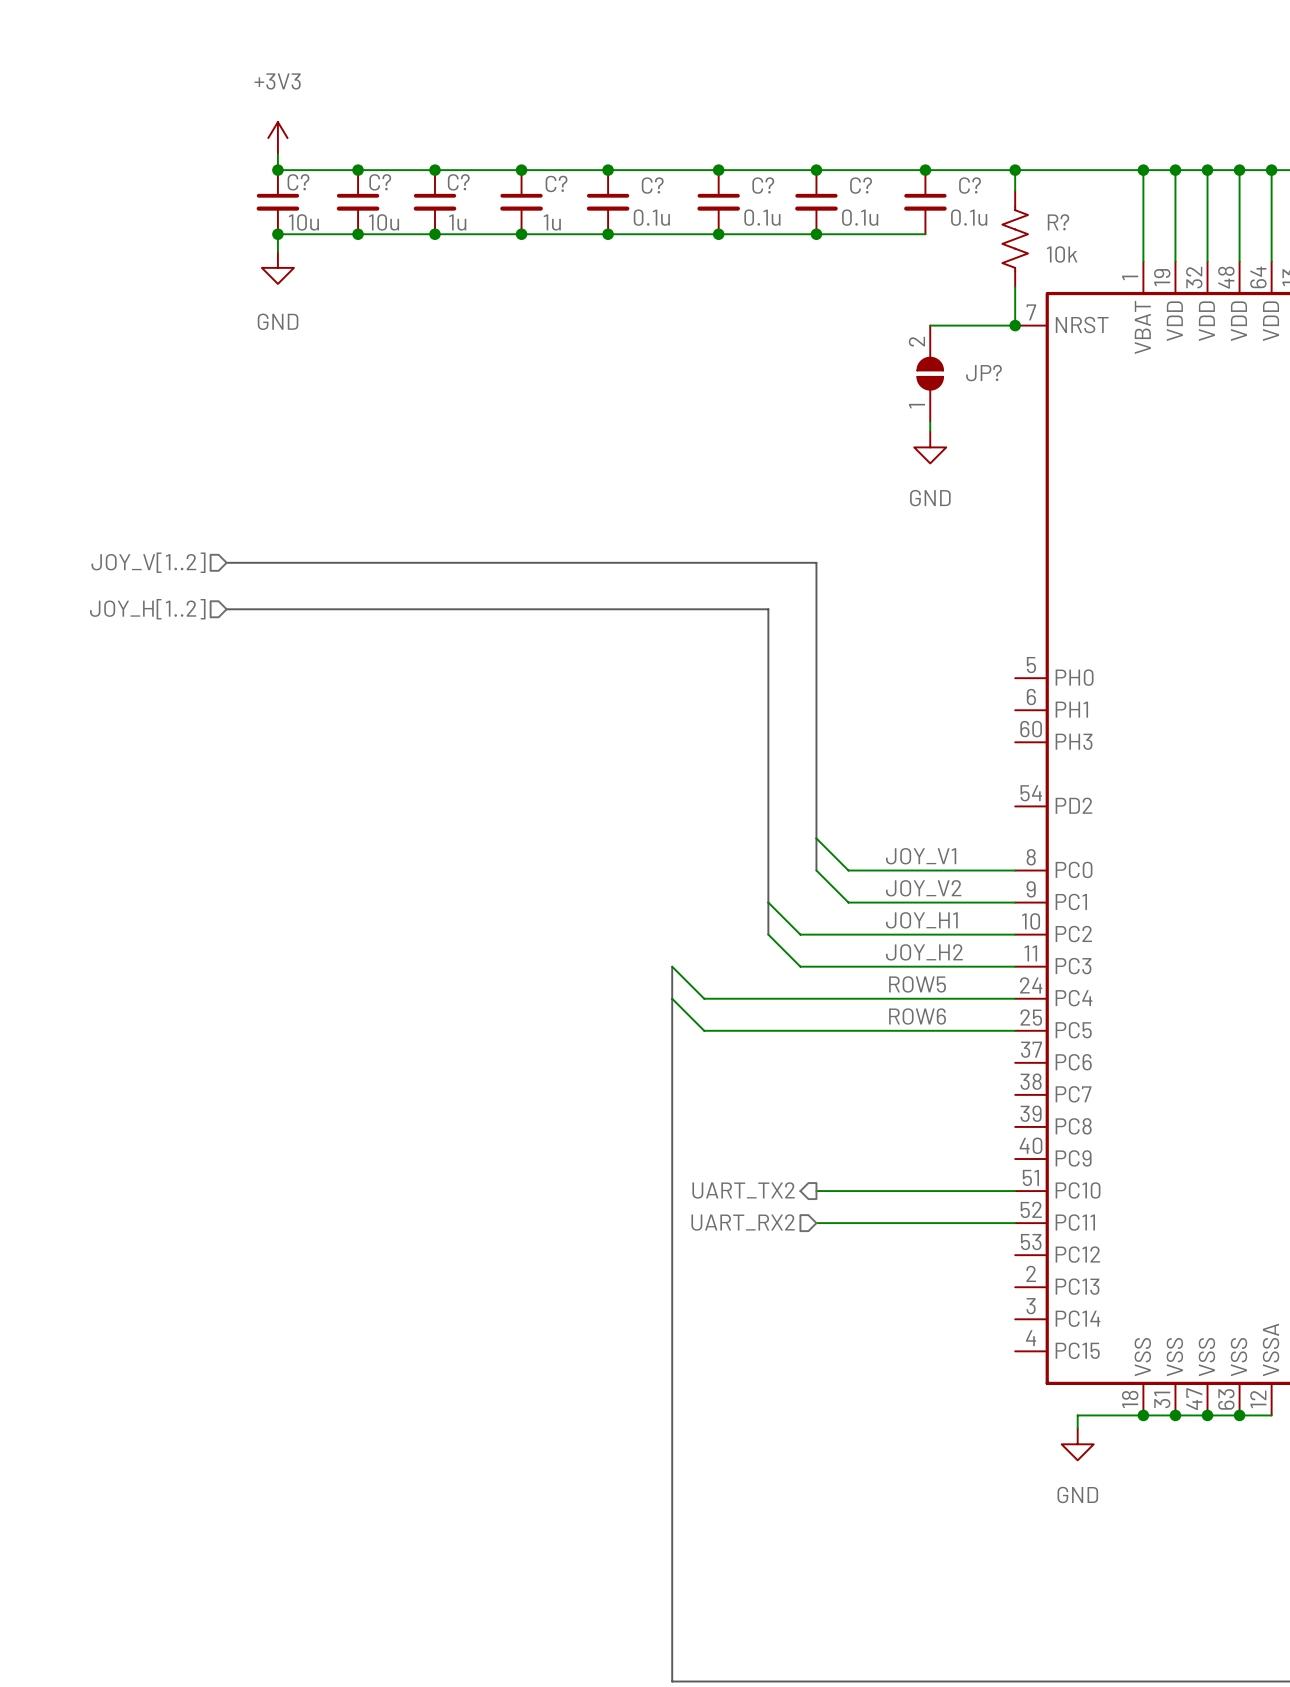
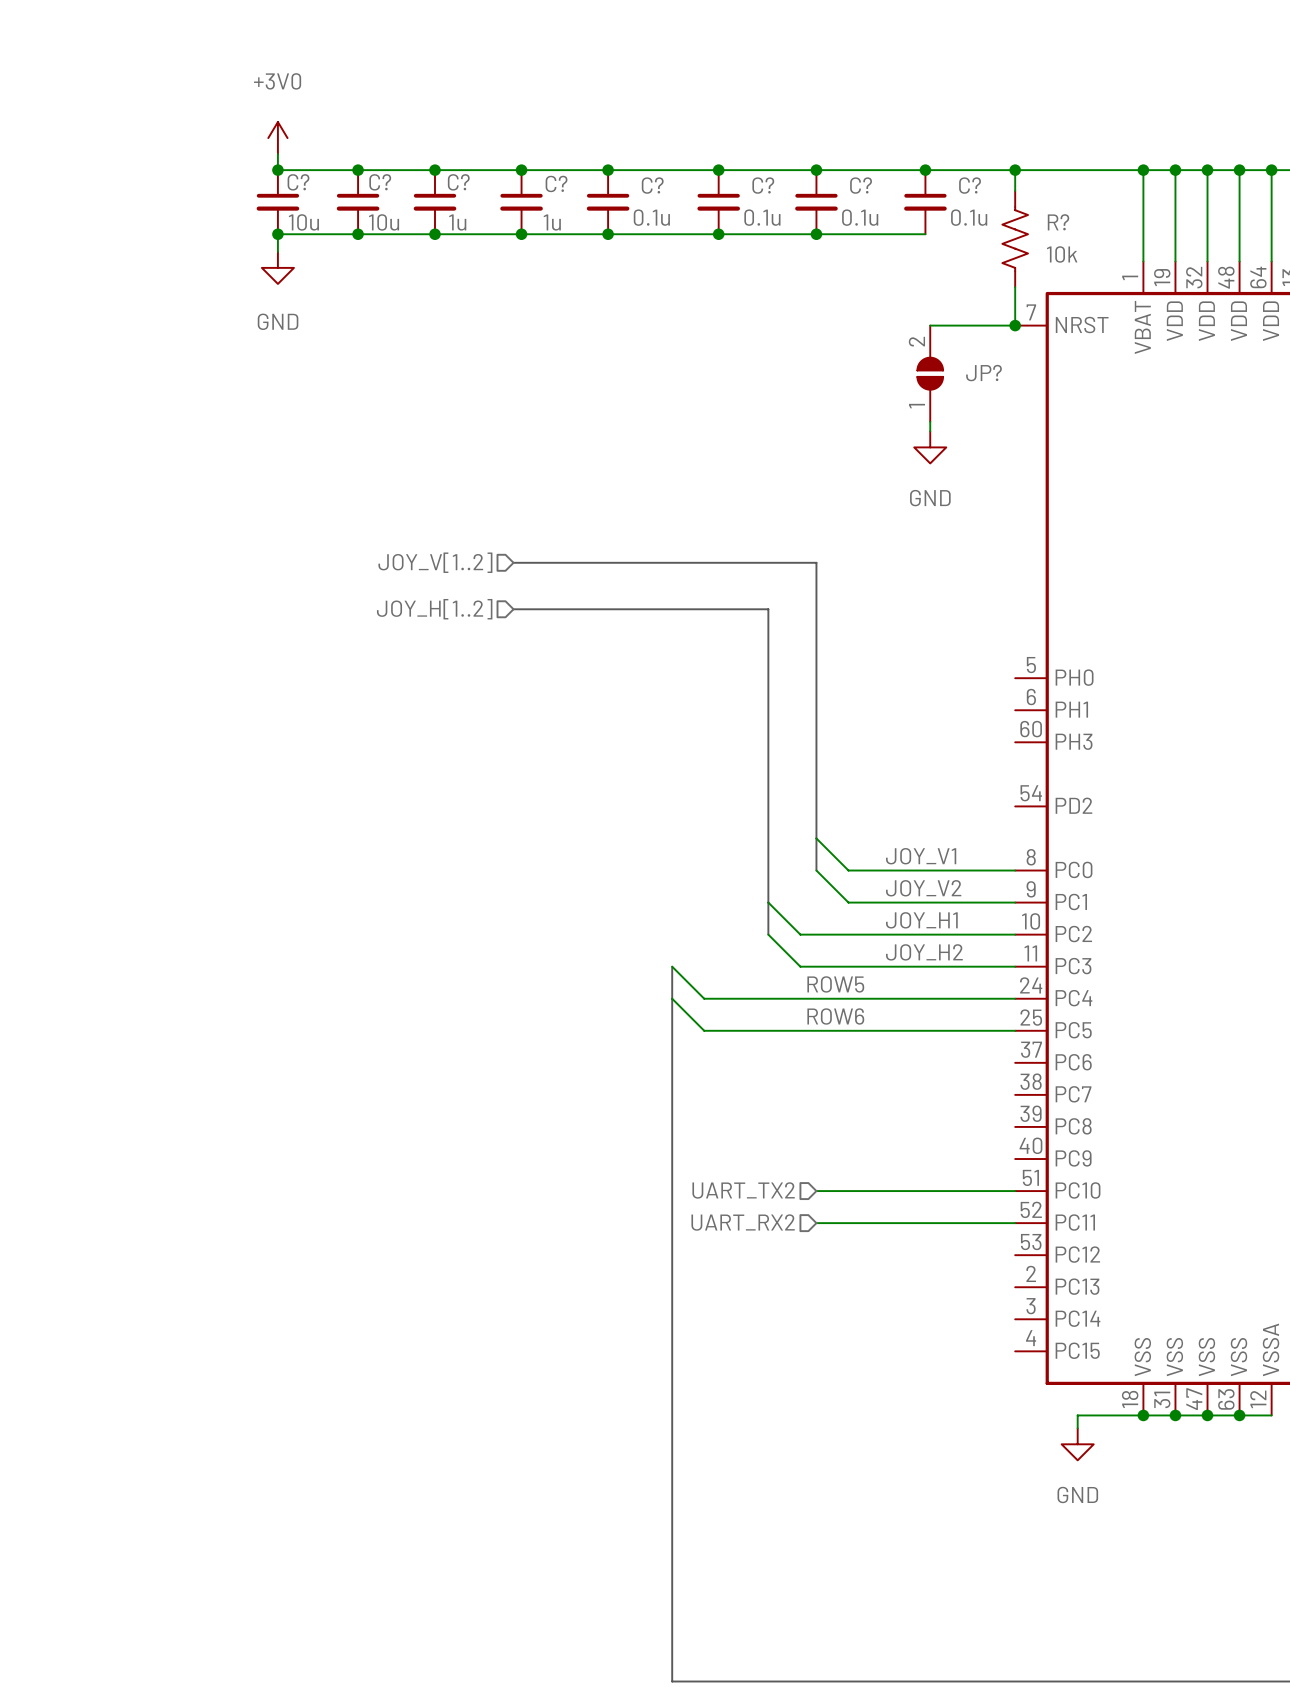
power symbol: +3V3 (277, 138) -> +3V0 (277, 138)
hierarchical label position: JOY_V[1..2] (148, 562) -> JOY_V[1..2] (435, 562)
bus: (226, 562) (513, 562) -> none
hierarchical label position: JOY_H[1..2] (147, 609) -> JOY_H[1..2] (434, 609)
bus: (226, 609) (513, 609) -> none
label position: ROW5 (917, 984) -> ROW5 (835, 984)
label position: ROW6 (917, 1016) -> ROW6 (835, 1016)
hierarchical label shape: output (743, 1190) -> input (743, 1190)

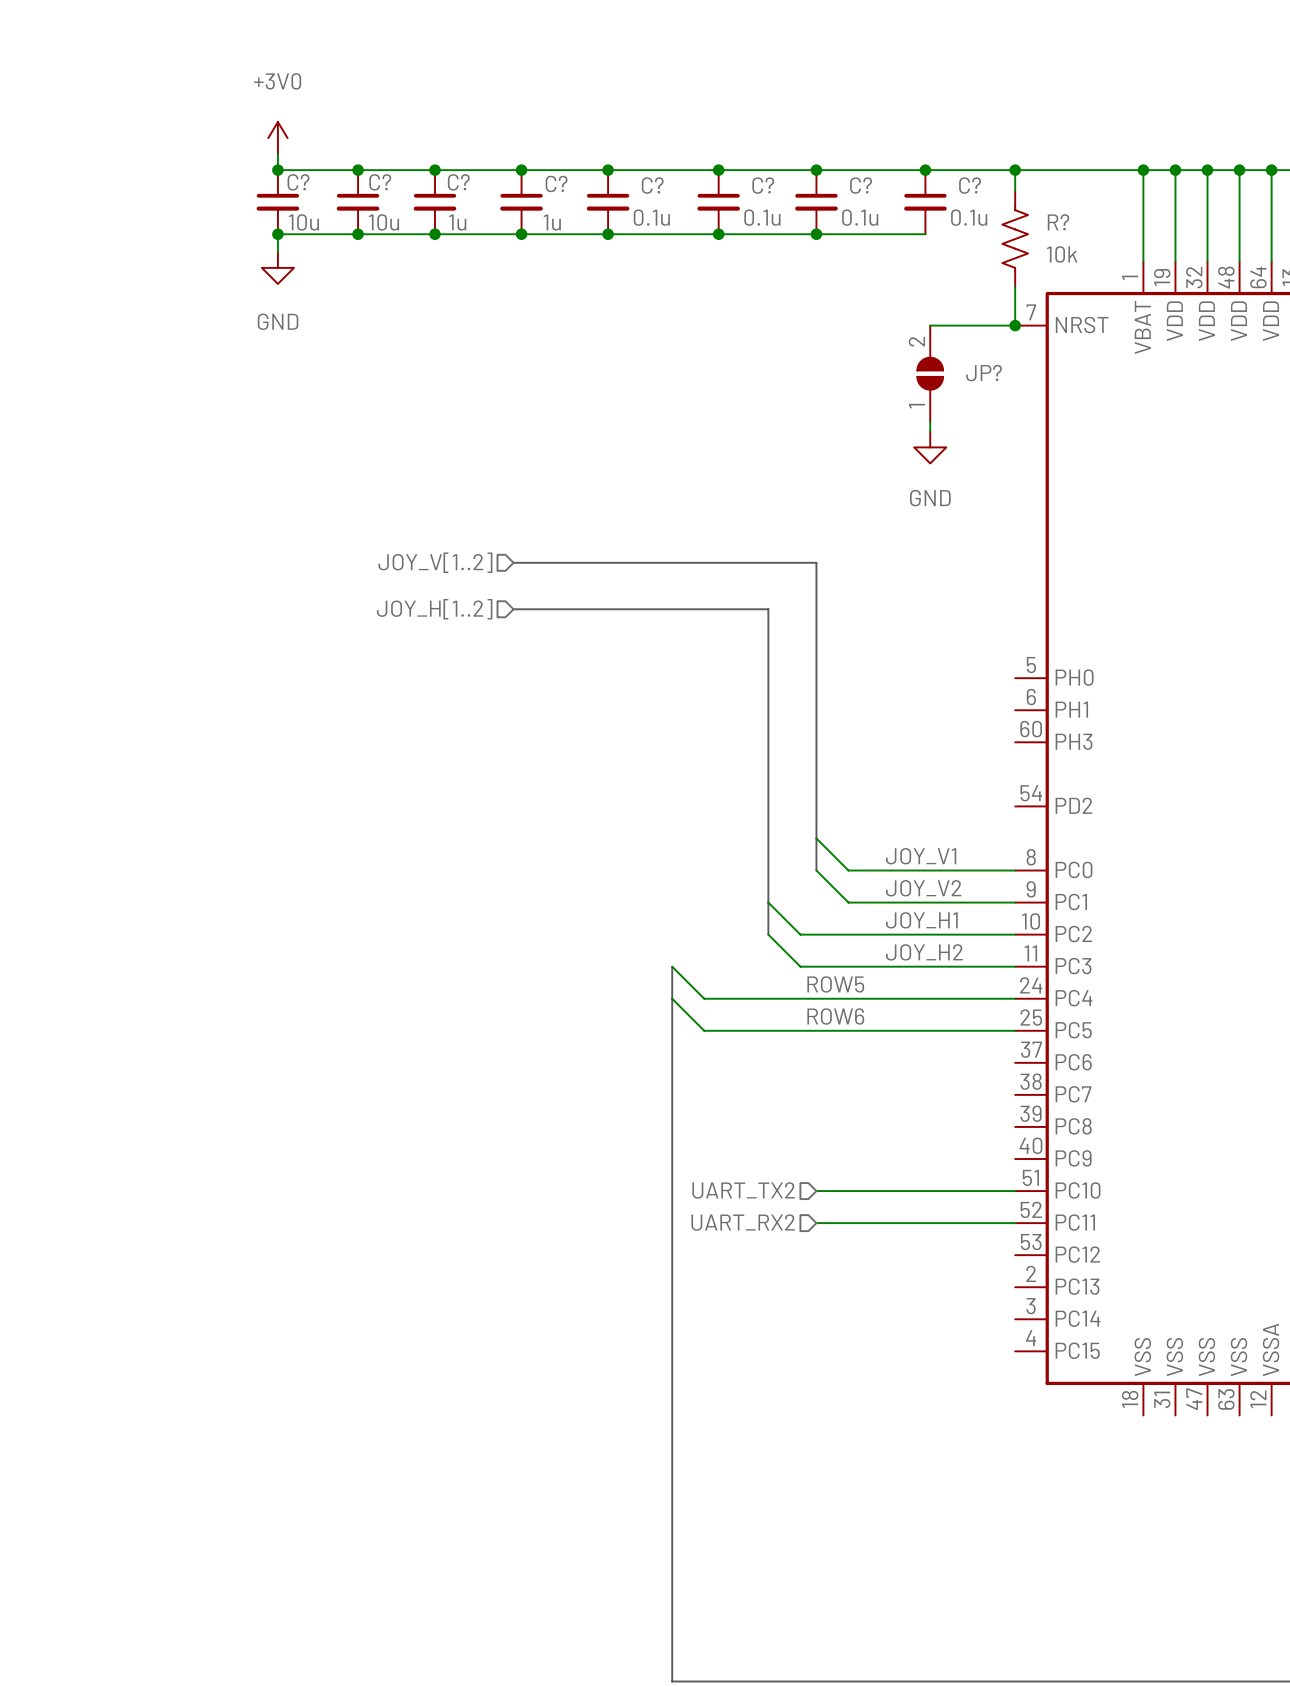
junction: (1143, 1415) -> none
junction: (1175, 1415) -> none
junction: (1207, 1415) -> none
junction: (1239, 1415) -> none
wire: (1271, 1415) (1077, 1415) (1077, 1428) -> none
power symbol: GND (1077, 1444) -> none

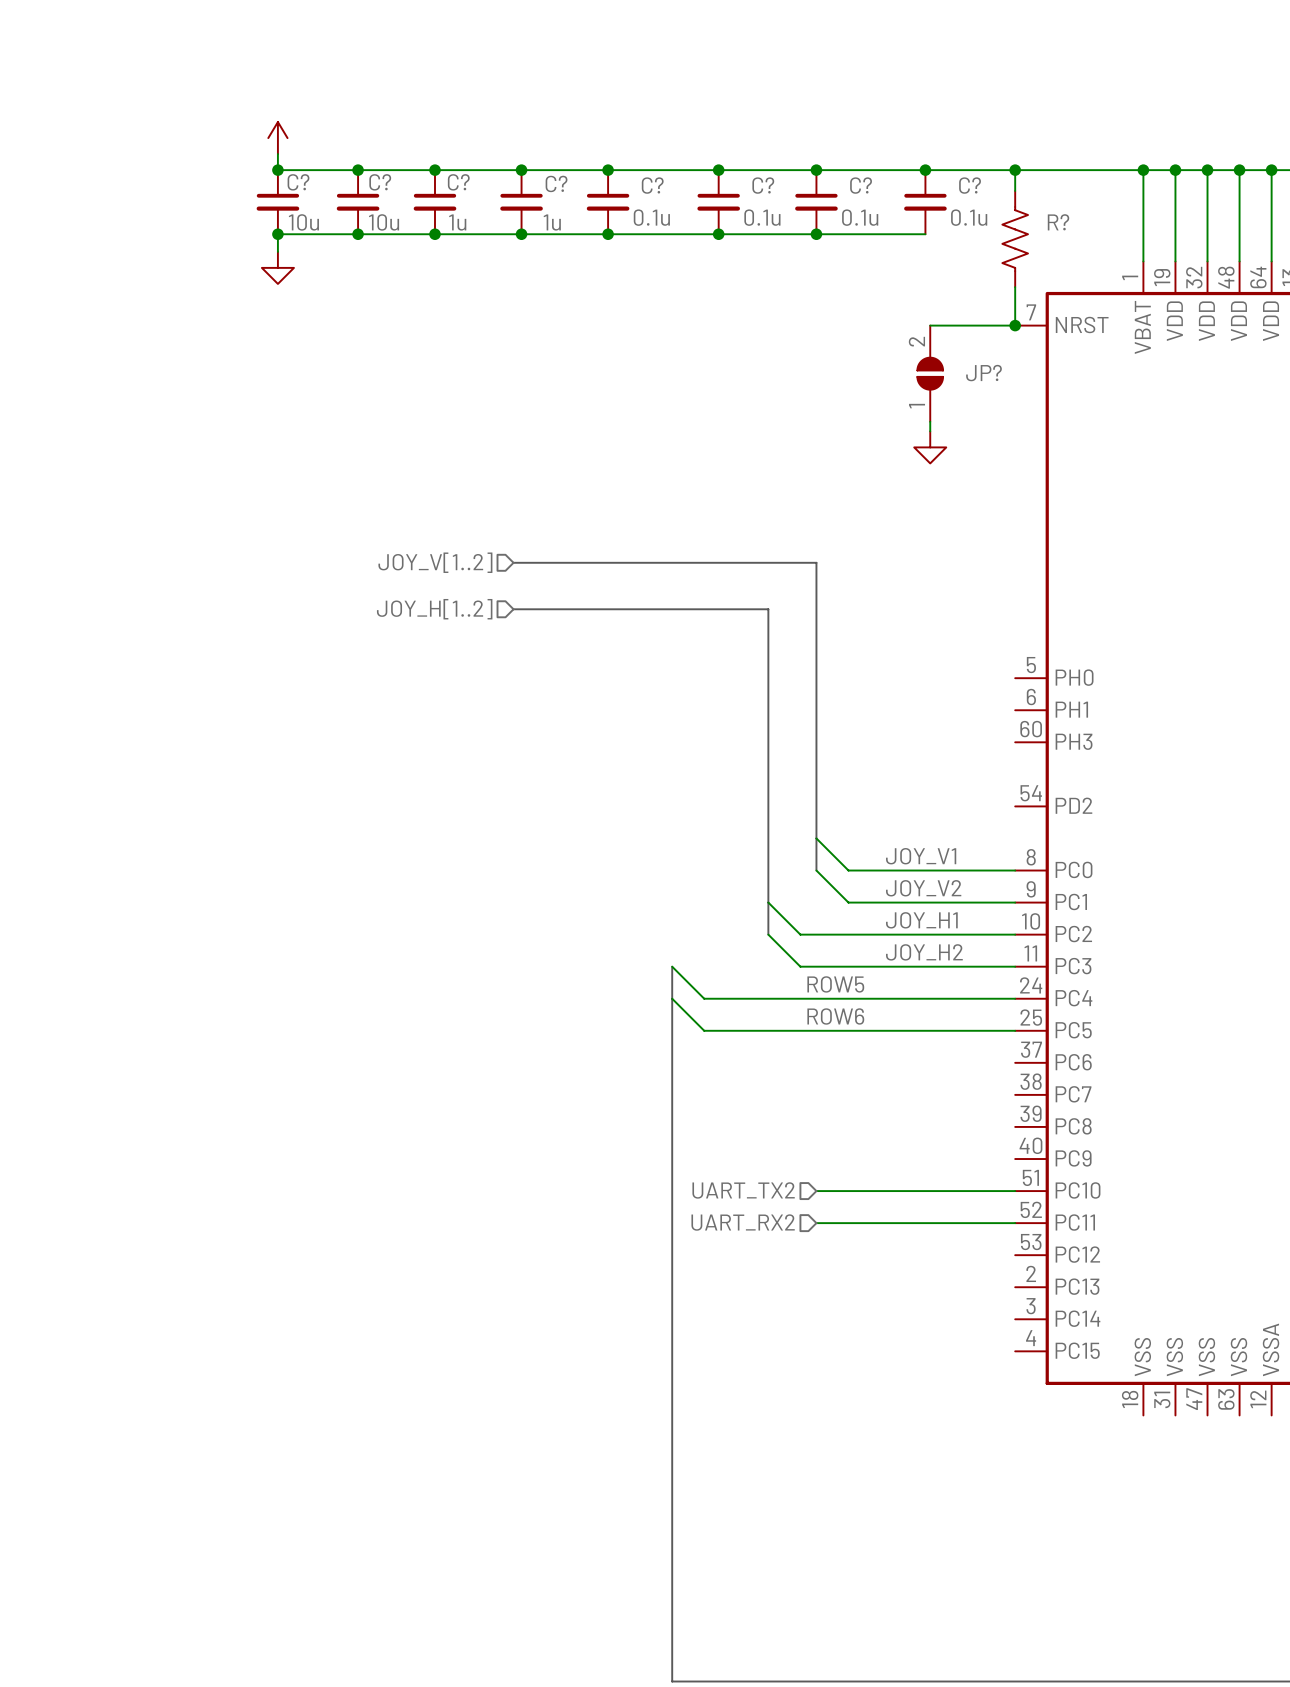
power symbol text: +3V0 (277, 81) -> none
R? value: 10k (1062, 254) -> none
power symbol text: GND (278, 321) -> none
power symbol text: GND (930, 498) -> none

